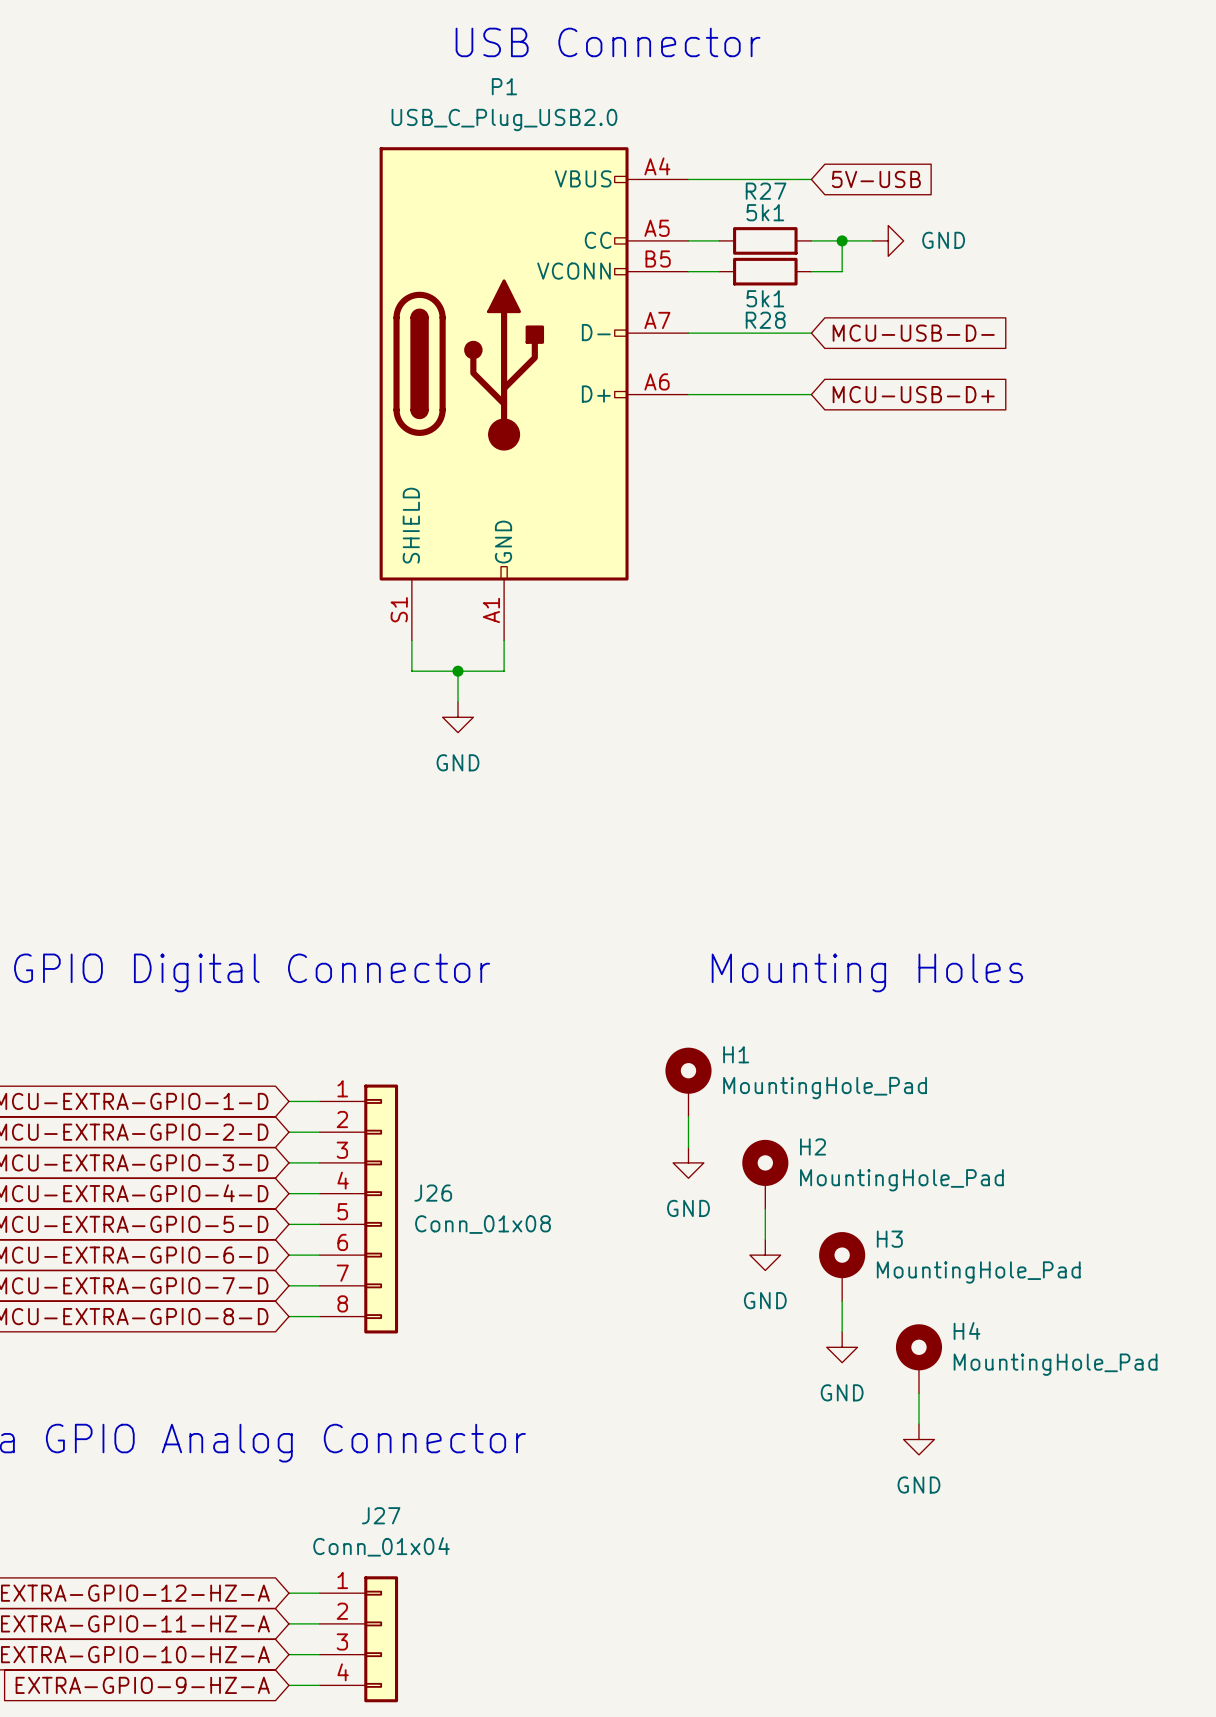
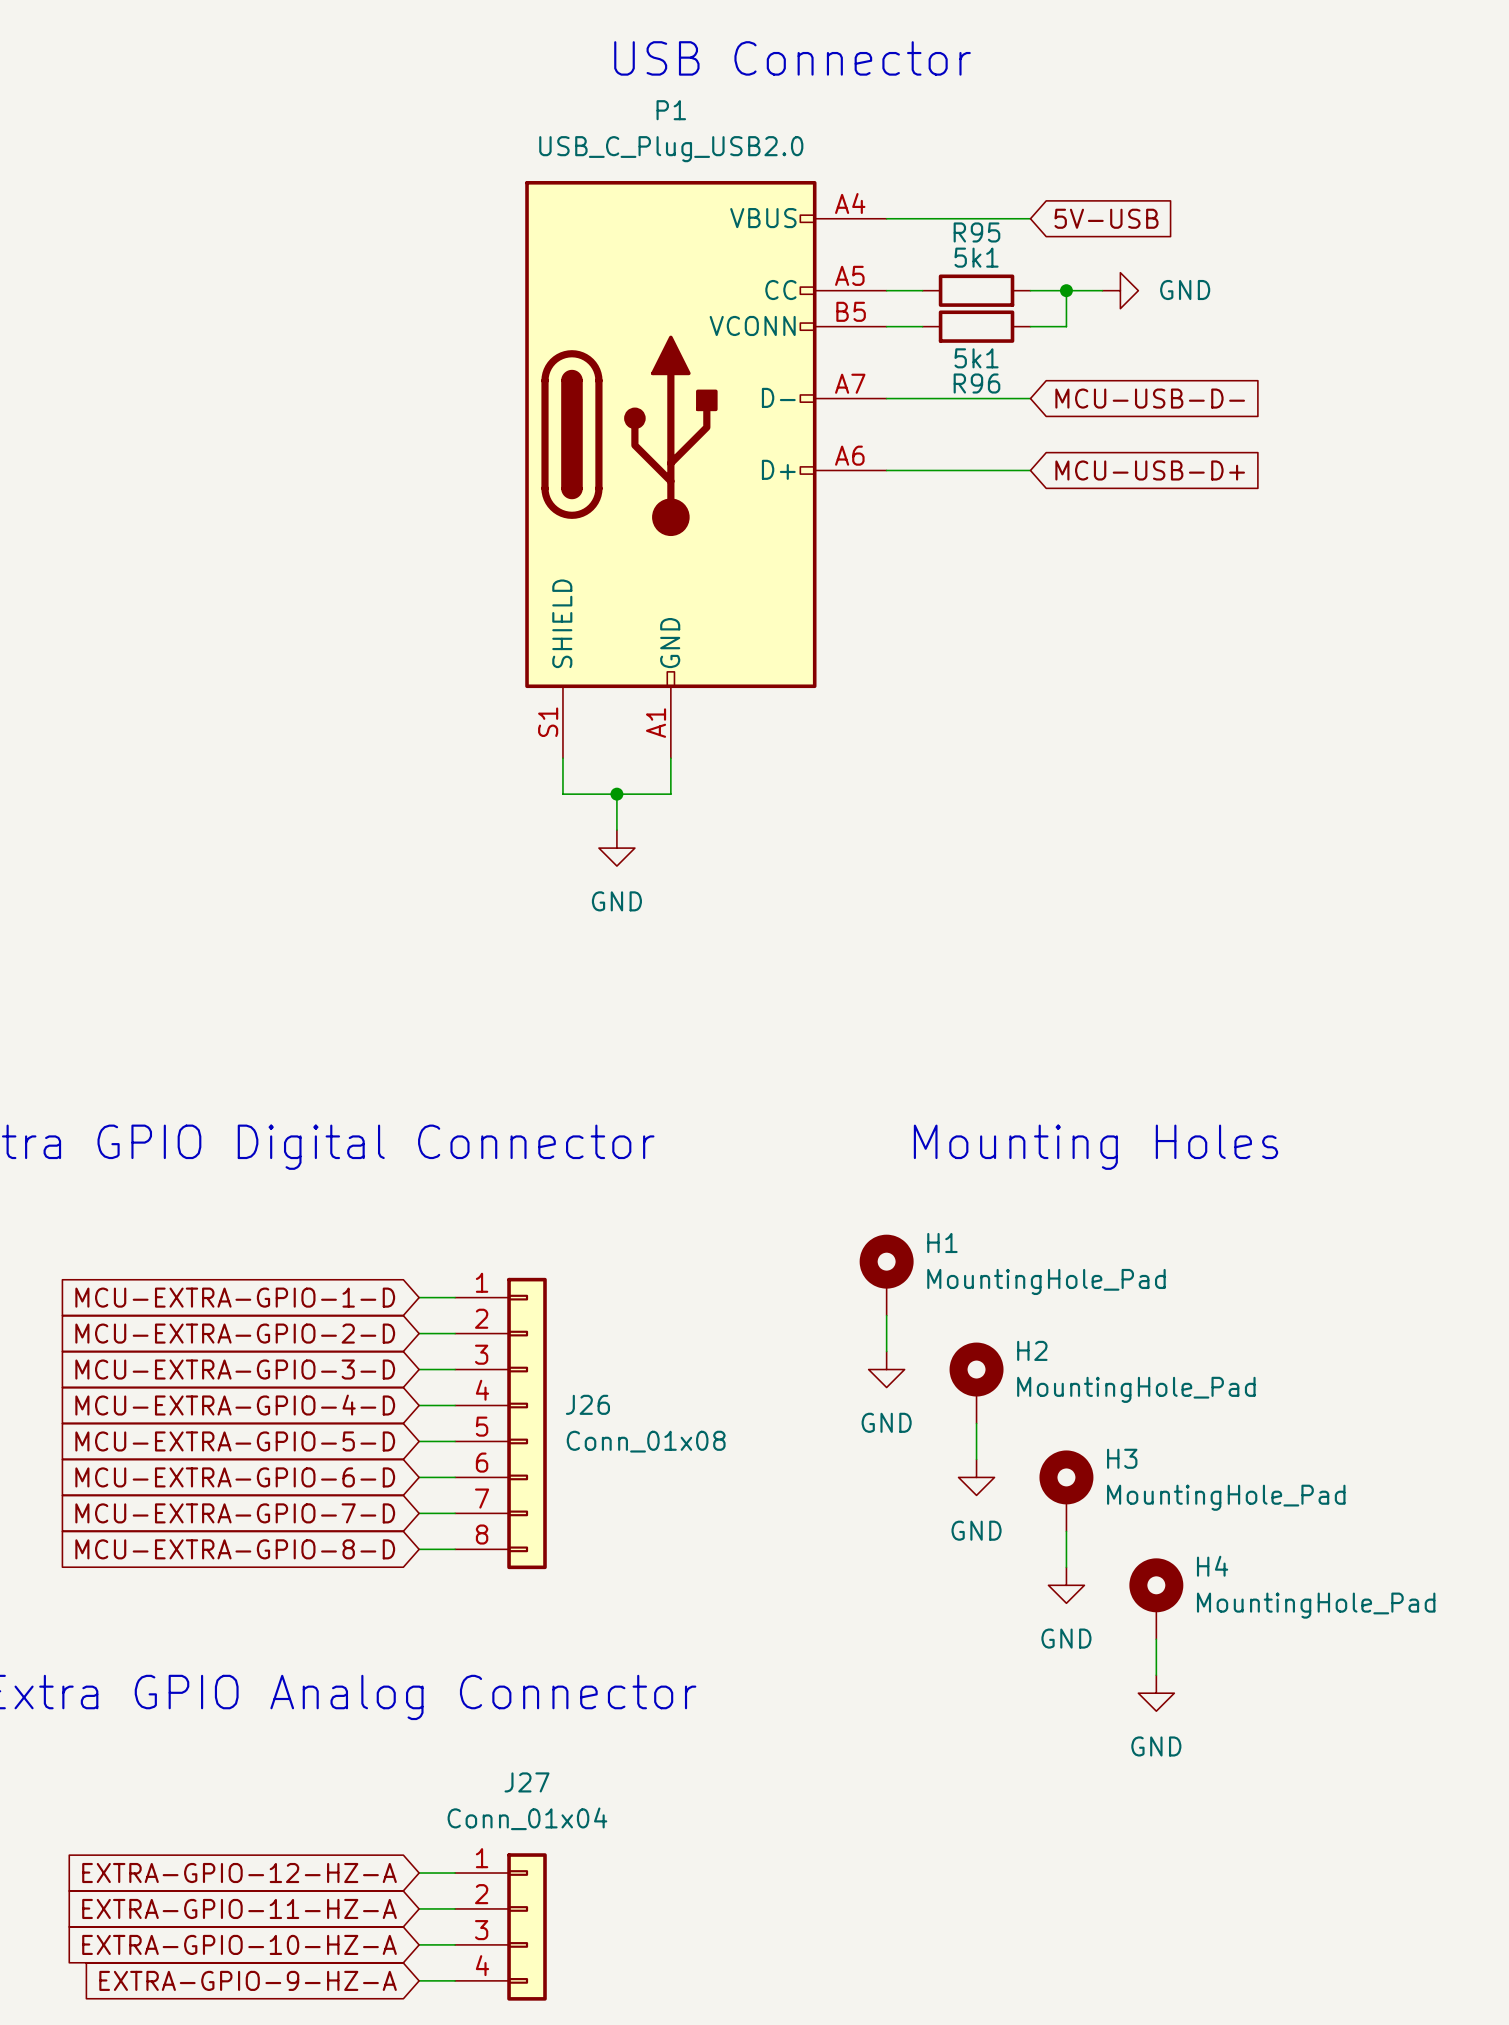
R27 name: R27 (766, 191) -> R95 (976, 232)
R28 name: R28 (765, 320) -> R96 (976, 383)

